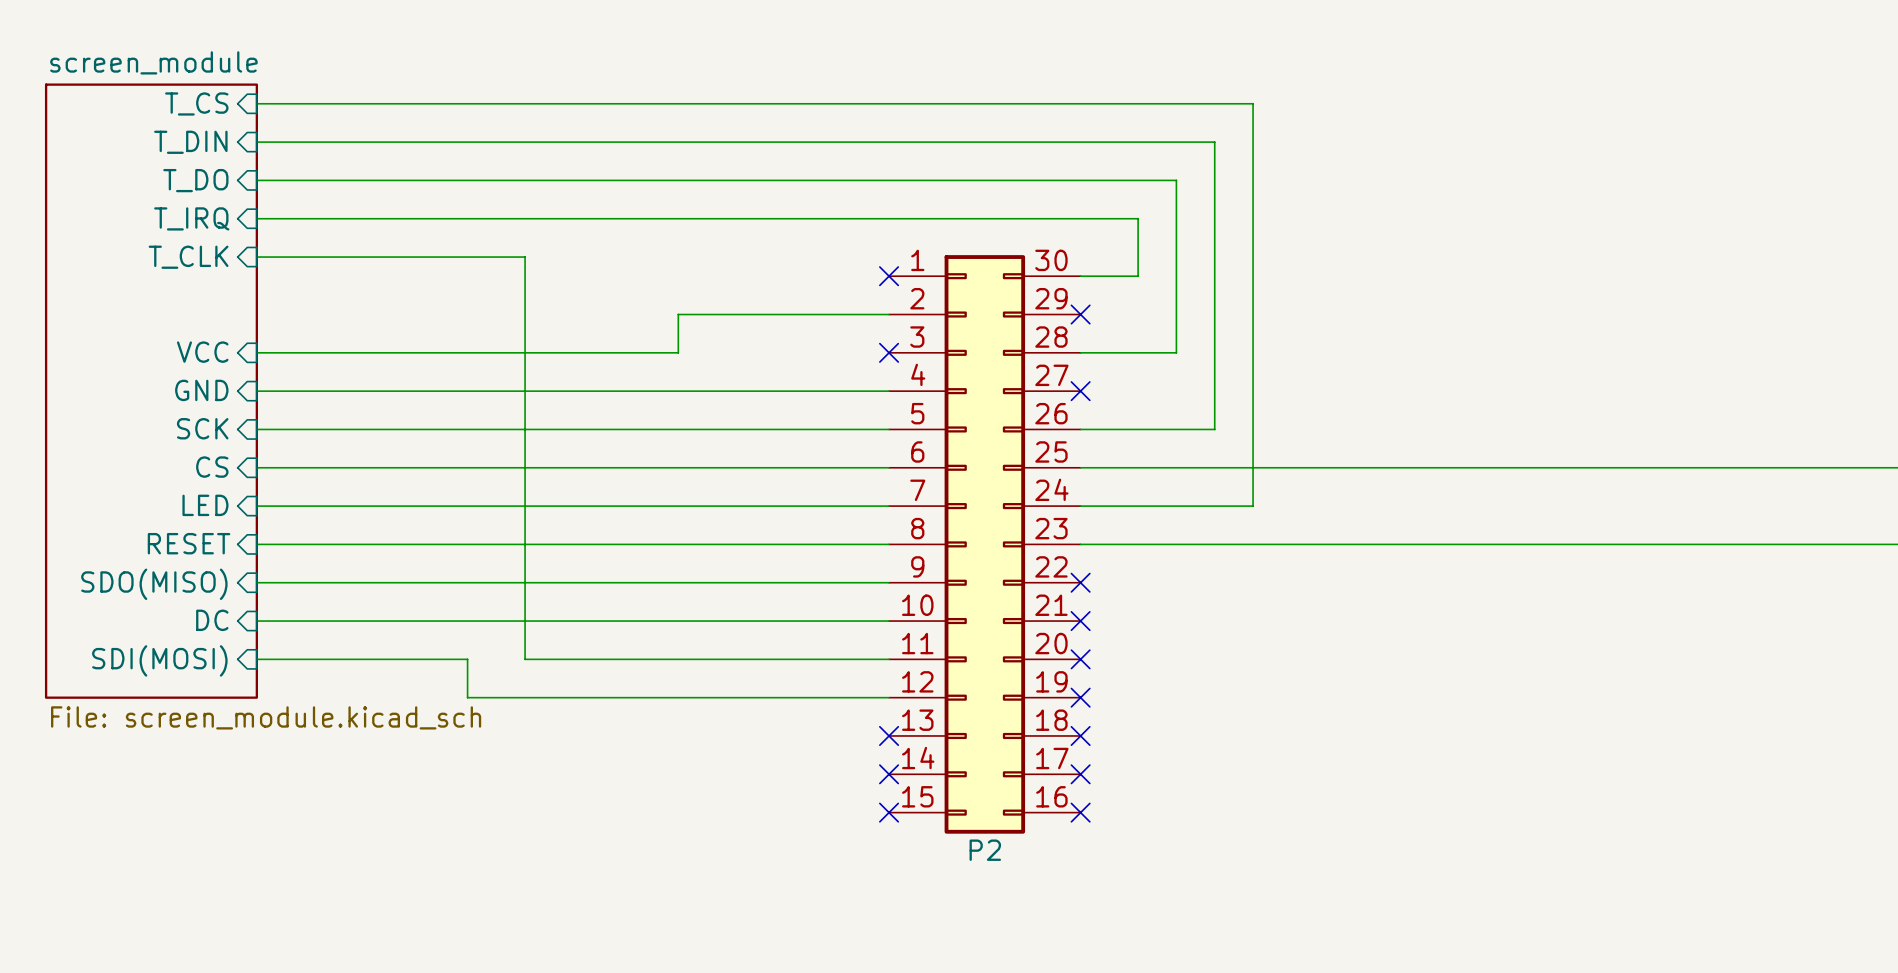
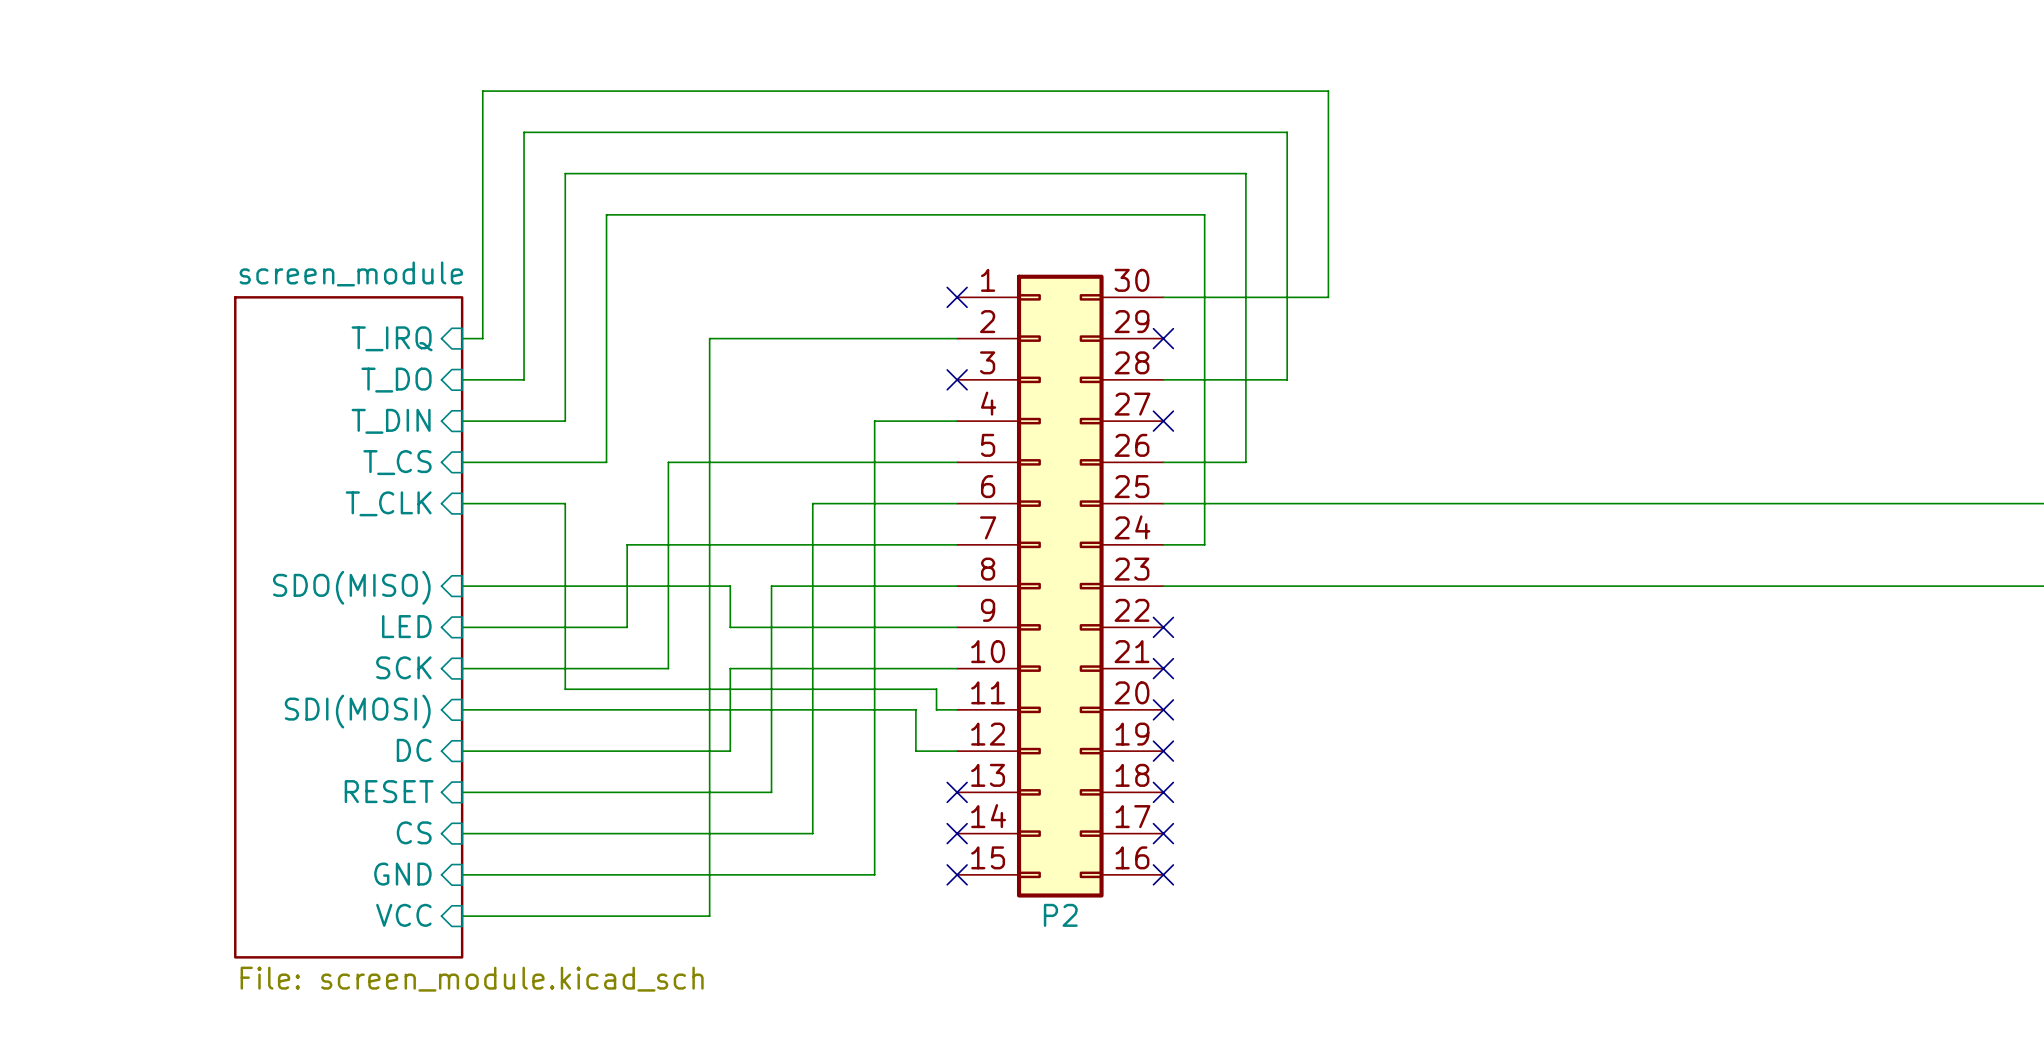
sheet pin position: T_CS (196, 103) -> T_CS (397, 462)
wire: (256, 103) (1253, 103) (1253, 506) (1118, 506) -> (606, 462) (606, 214) (1204, 214) (1204, 544)
sheet pin position: T_DIN (190, 142) -> T_DIN (391, 421)
wire: (256, 142) (1214, 142) (1214, 429) (1157, 429) -> (565, 276) (565, 173) (1245, 173) (1245, 462)
sheet pin position: T_DO (195, 180) -> T_DO (396, 380)
wire: (256, 180) (1176, 180) (1176, 352) -> (524, 379) (524, 132) (1287, 132) (1287, 379) (1266, 379)
sheet pin position: T_IRQ (191, 218) -> T_IRQ (392, 338)
wire: (256, 218) (1138, 218) (1138, 276) -> (462, 338) (482, 338) (482, 91) (1328, 91) (1328, 297) (1225, 297)
sheet pin position: T_CLK (188, 257) -> T_CLK (388, 503)
wire: (256, 257) (525, 257) -> none
wire: (678, 314) (678, 352) (486, 352) -> (730, 338) (709, 338) (709, 916) (462, 916)
sheet pin: VCC (202, 352) -> none
wire: (256, 352) (429, 352) -> none
sheet pin: GND (201, 390) -> none
sheet screen_module position: (151, 391) -> (348, 627)
wire: (256, 391) (429, 391) -> none
wire: (812, 391) (525, 391) (525, 467) (754, 467) -> (874, 421) (874, 874) (462, 874)
sheet pin position: SCK (202, 428) -> SCK (403, 667)
wire: (256, 429) (429, 429) -> none
wire: (563, 429) (620, 429) -> (668, 668) (668, 462)
sheet pin position: CS (212, 467) -> CS (414, 832)
wire: (256, 467) (429, 467) -> none
wire: none -> (812, 503) (812, 833) (462, 833)
sheet pin position: LED (205, 505) -> LED (406, 626)
wire: (256, 506) (582, 506) -> none
sheet pin position: RESET (189, 543) -> RESET (389, 791)
wire: (256, 544) (429, 544) -> none
wire: (678, 544) (716, 544) -> (730, 586) (730, 627)
wire: none -> (771, 586) (771, 792) (462, 792)
wire: (256, 582) (429, 582) -> none
wire: (582, 582) (678, 582) -> (627, 627) (627, 544)
sheet pin position: SDO(MISO) (154, 584) -> SDO(MISO) (351, 587)
sheet pin position: DC (212, 620) -> DC (414, 750)
wire: (256, 621) (429, 621) -> none
wire: (620, 621) (678, 621) -> (730, 751) (730, 668)
wire: (525, 640) (525, 659) -> (503, 709) (565, 709)
wire: none -> (565, 689) (936, 689) (936, 709)
wire: (256, 659) (429, 659) -> none
wire: (467, 659) (467, 697) -> (462, 751) (503, 751)
wire: (850, 659) (869, 659) -> (915, 709) (915, 751)
sheet pin position: SDI(MOSI) (159, 660) -> SDI(MOSI) (357, 711)
wire: (678, 697) (850, 697) -> none
sheet pin: none -> GND (402, 874)
sheet pin: none -> VCC (403, 915)

